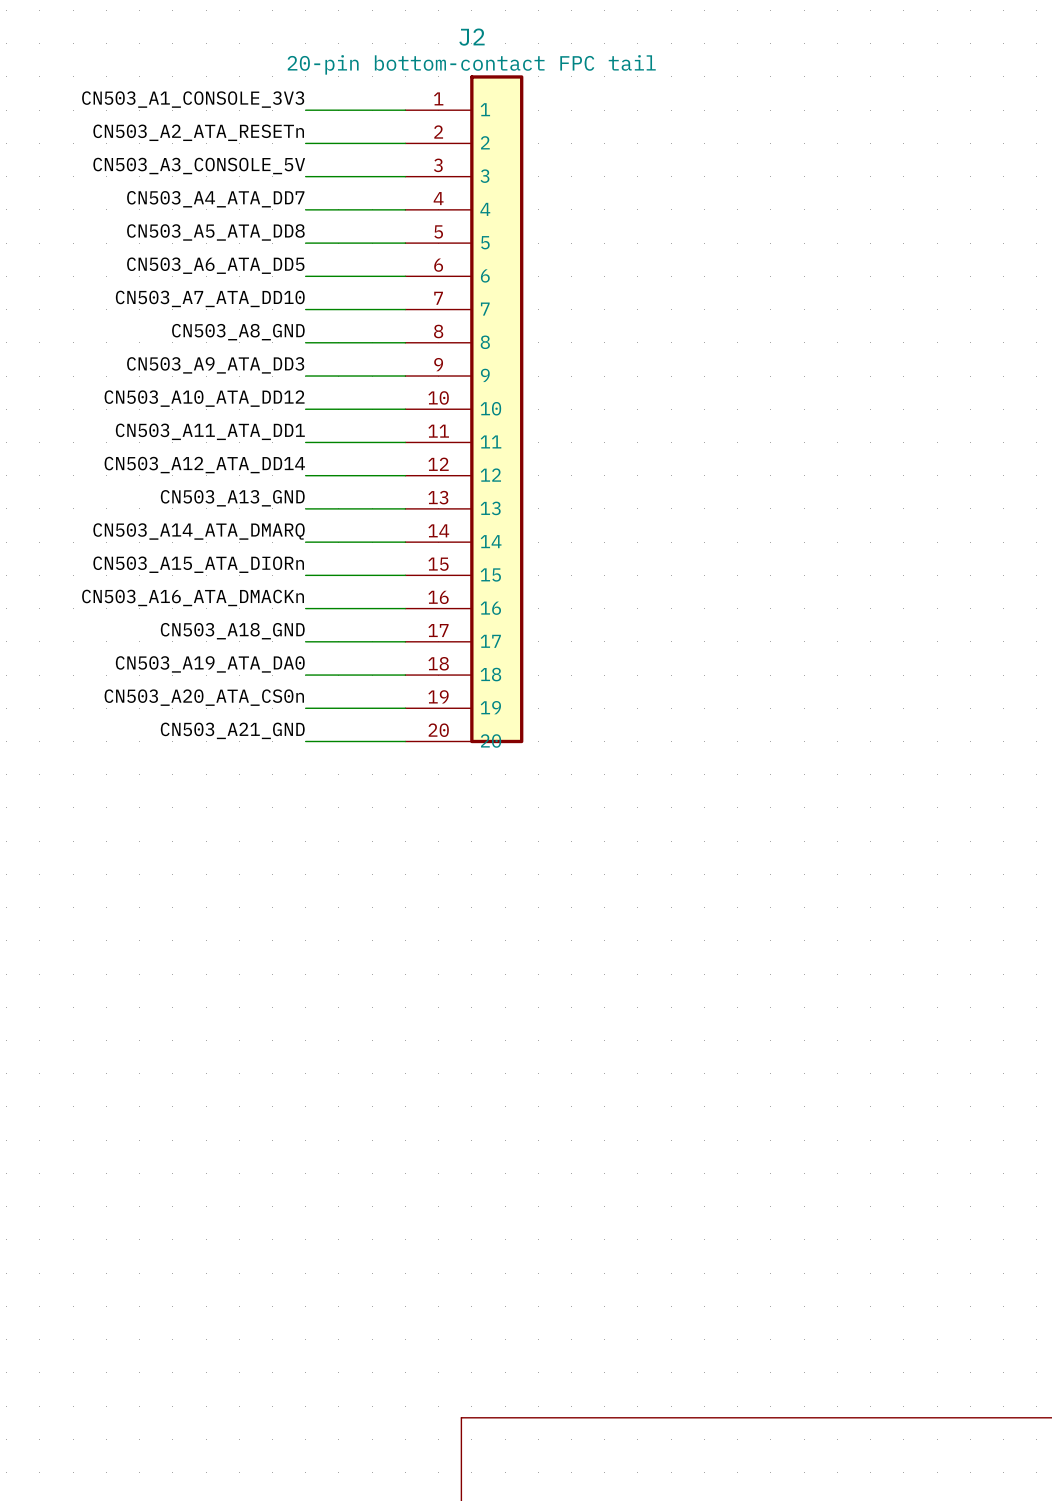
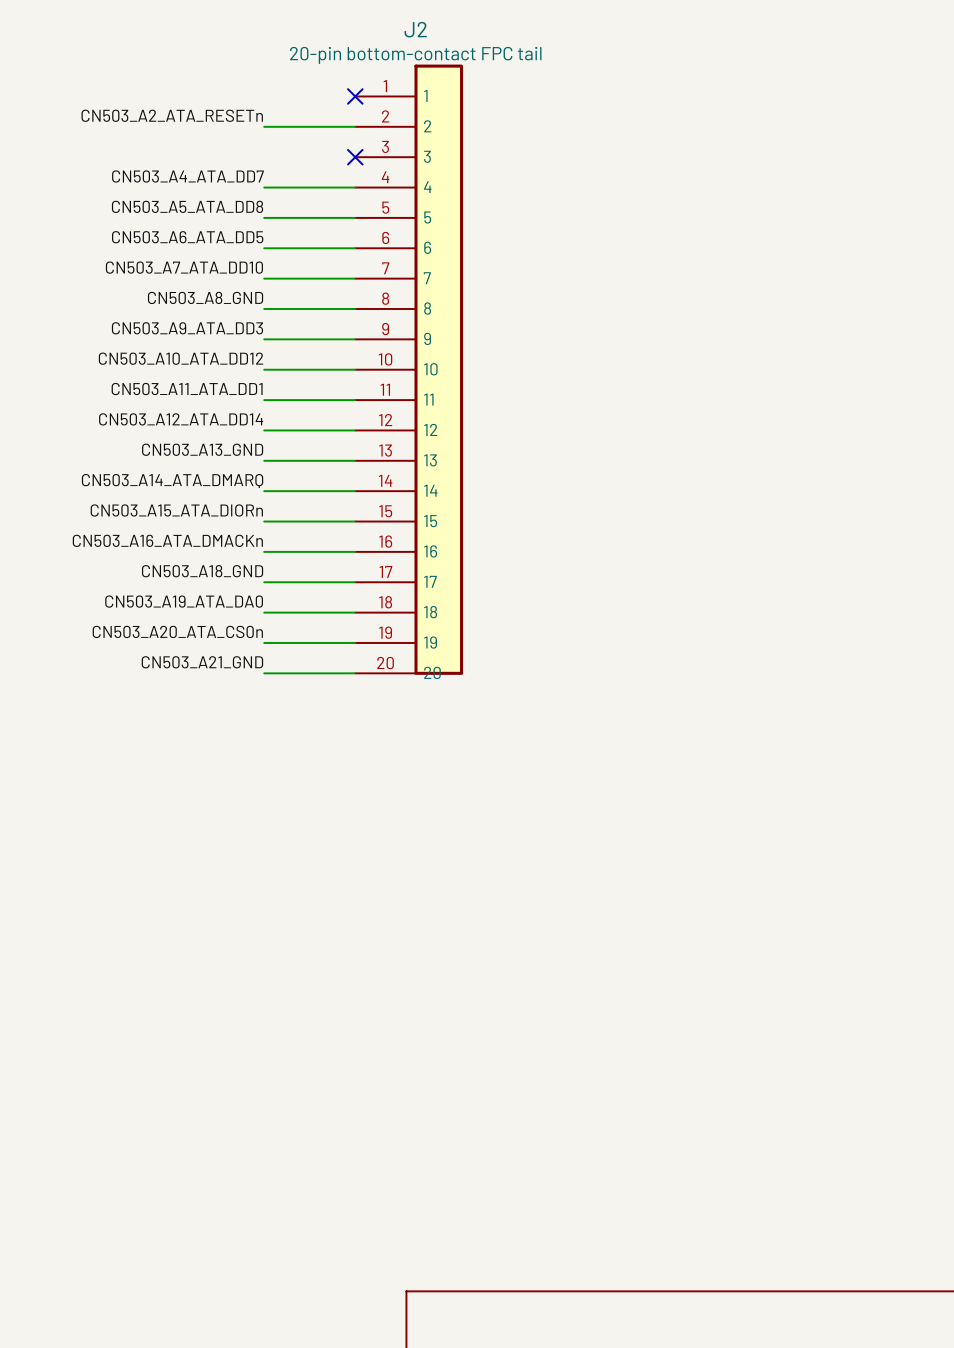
label: CN503_A1_CONSOLE_3V3 (193, 99) -> none
wire: (305, 110) (405, 110) -> none
no-connect mark: none -> (355, 96)
label: CN503_A3_CONSOLE_5V (199, 166) -> none
wire: (305, 176) (405, 176) -> none
no-connect mark: none -> (355, 157)

